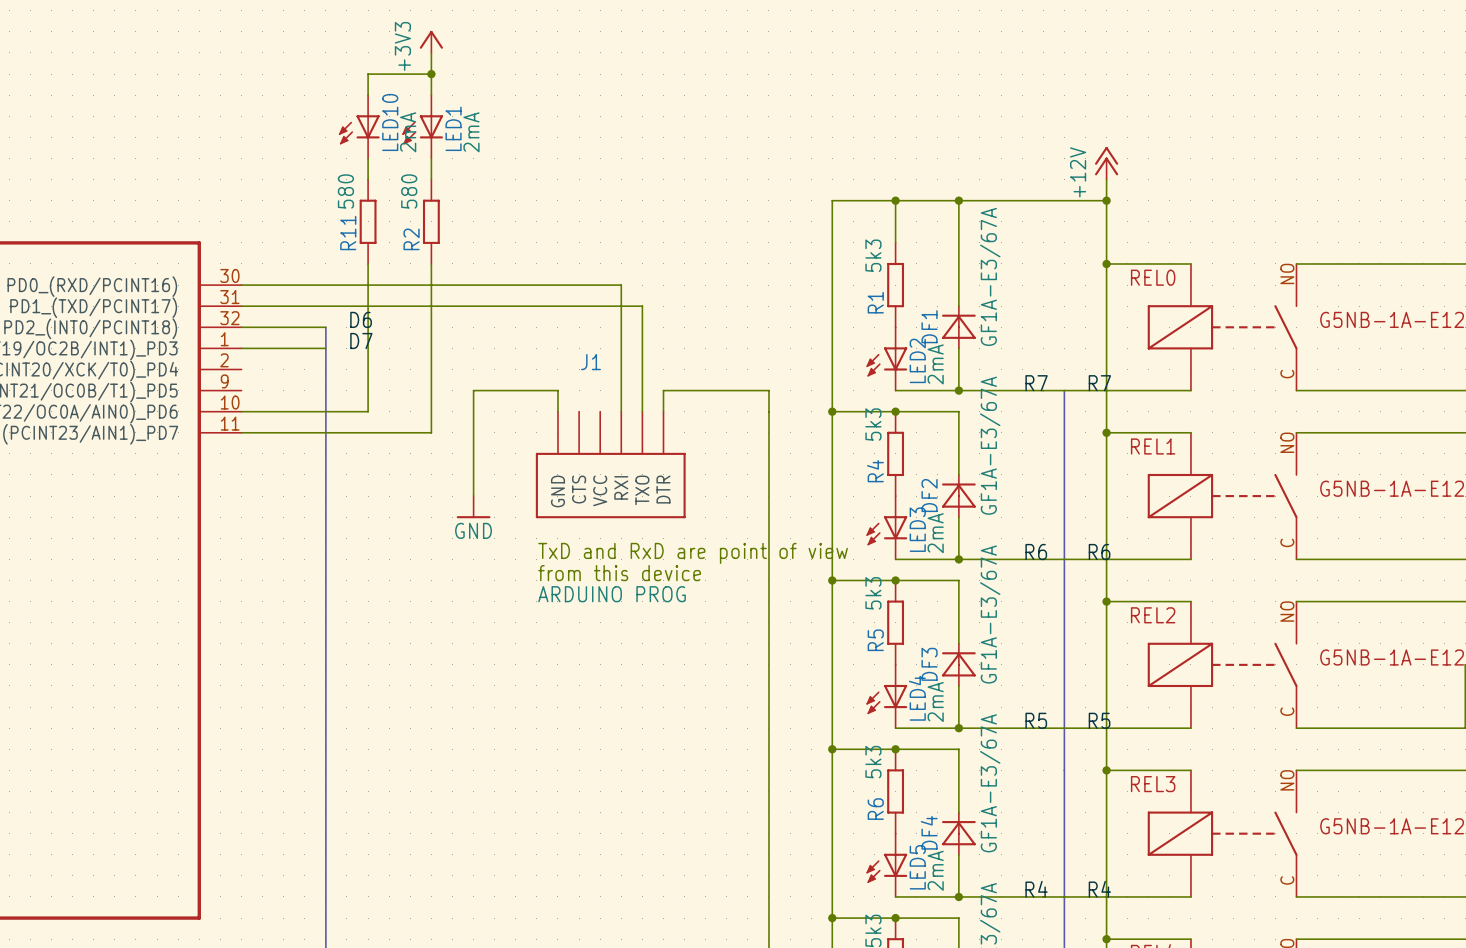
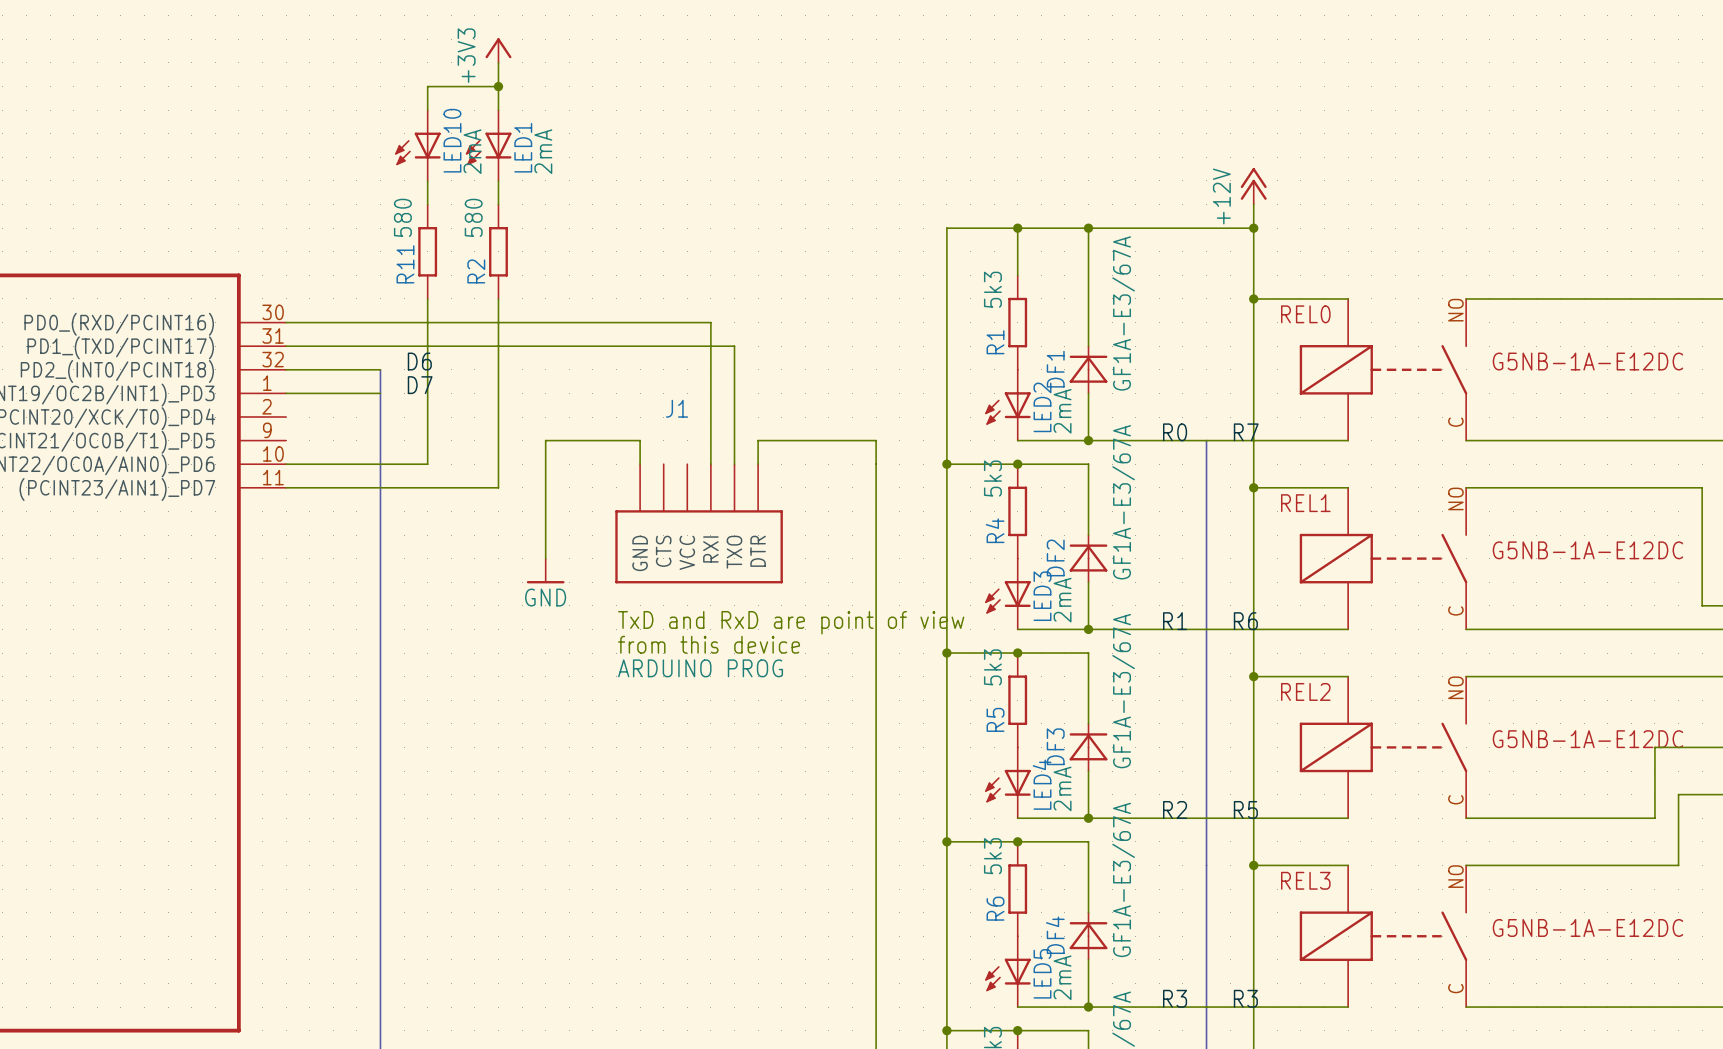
label: R7 (1036, 383) -> R0 (1175, 432)
label: R6 (1036, 552) -> R1 (1175, 621)
label: R5 (1036, 720) -> R2 (1175, 809)
label: R4 (1036, 889) -> R3 (1175, 998)
label: R4 (1099, 889) -> R3 (1245, 998)

